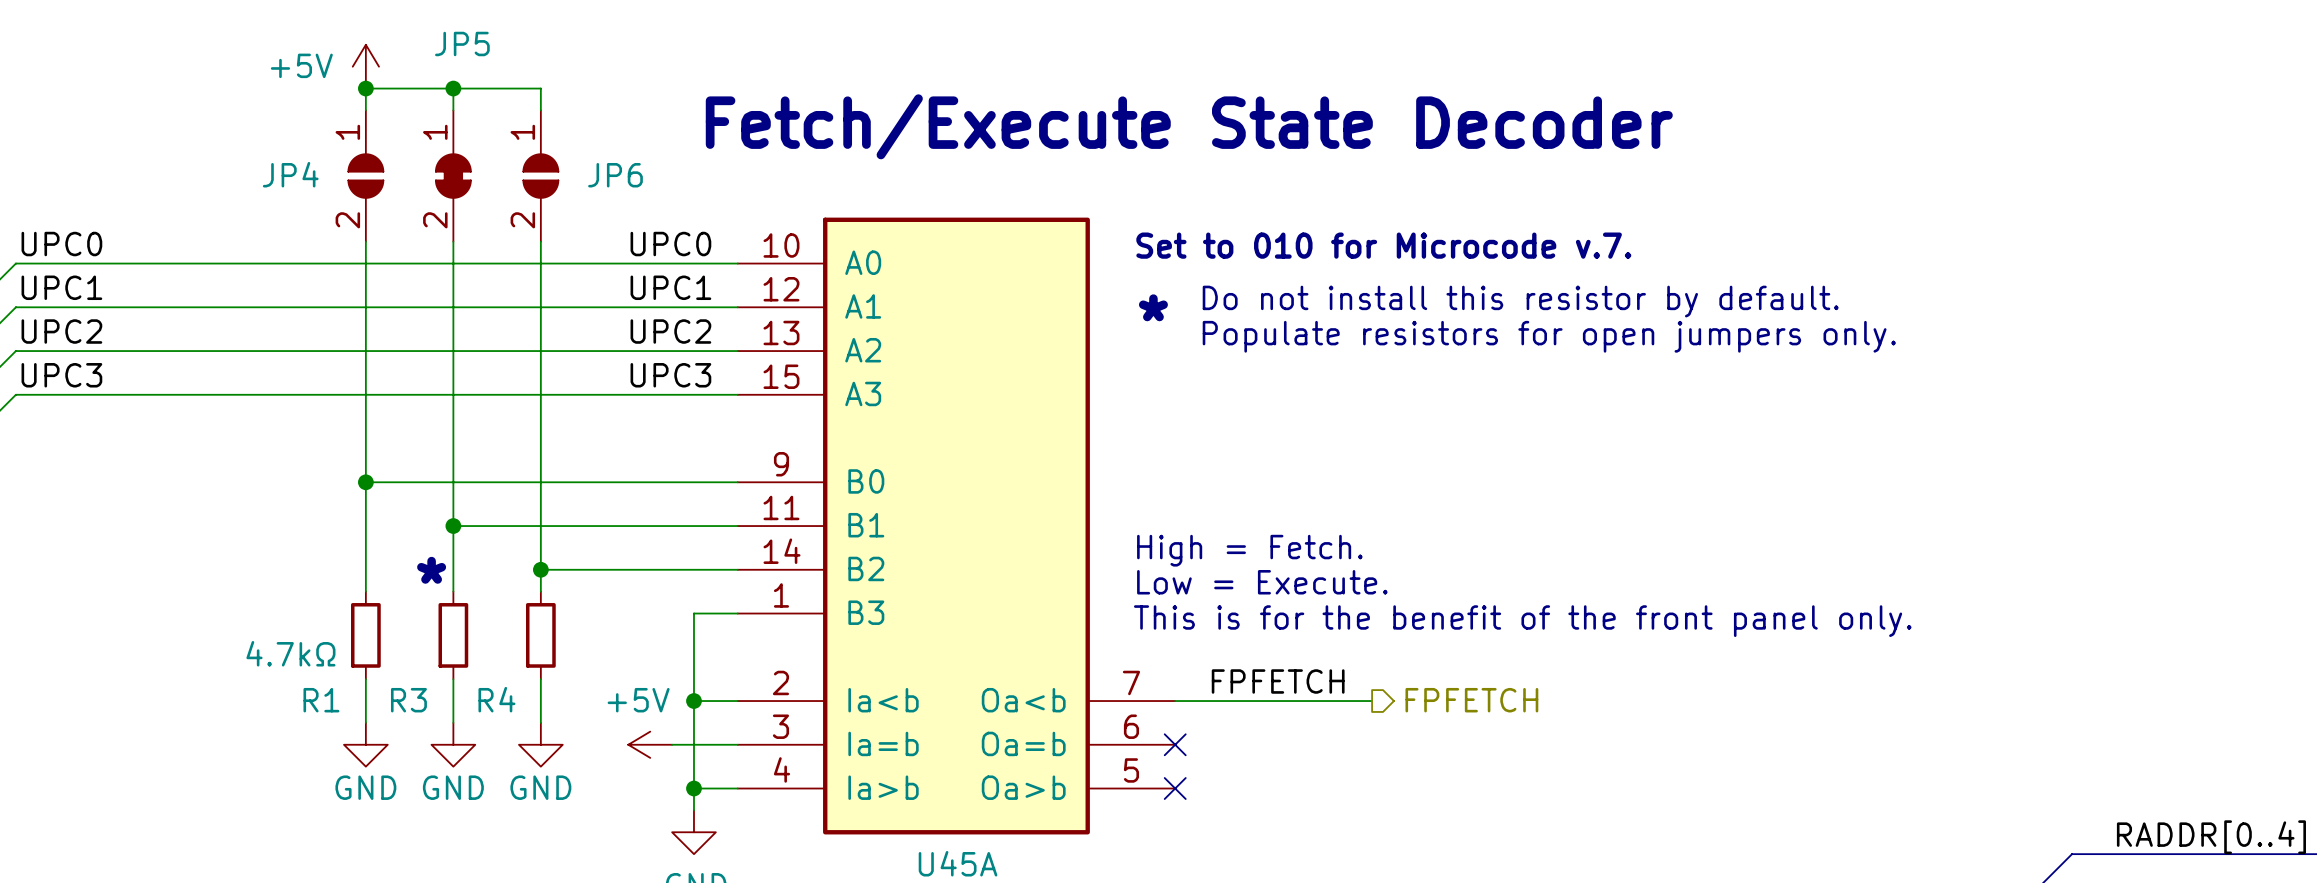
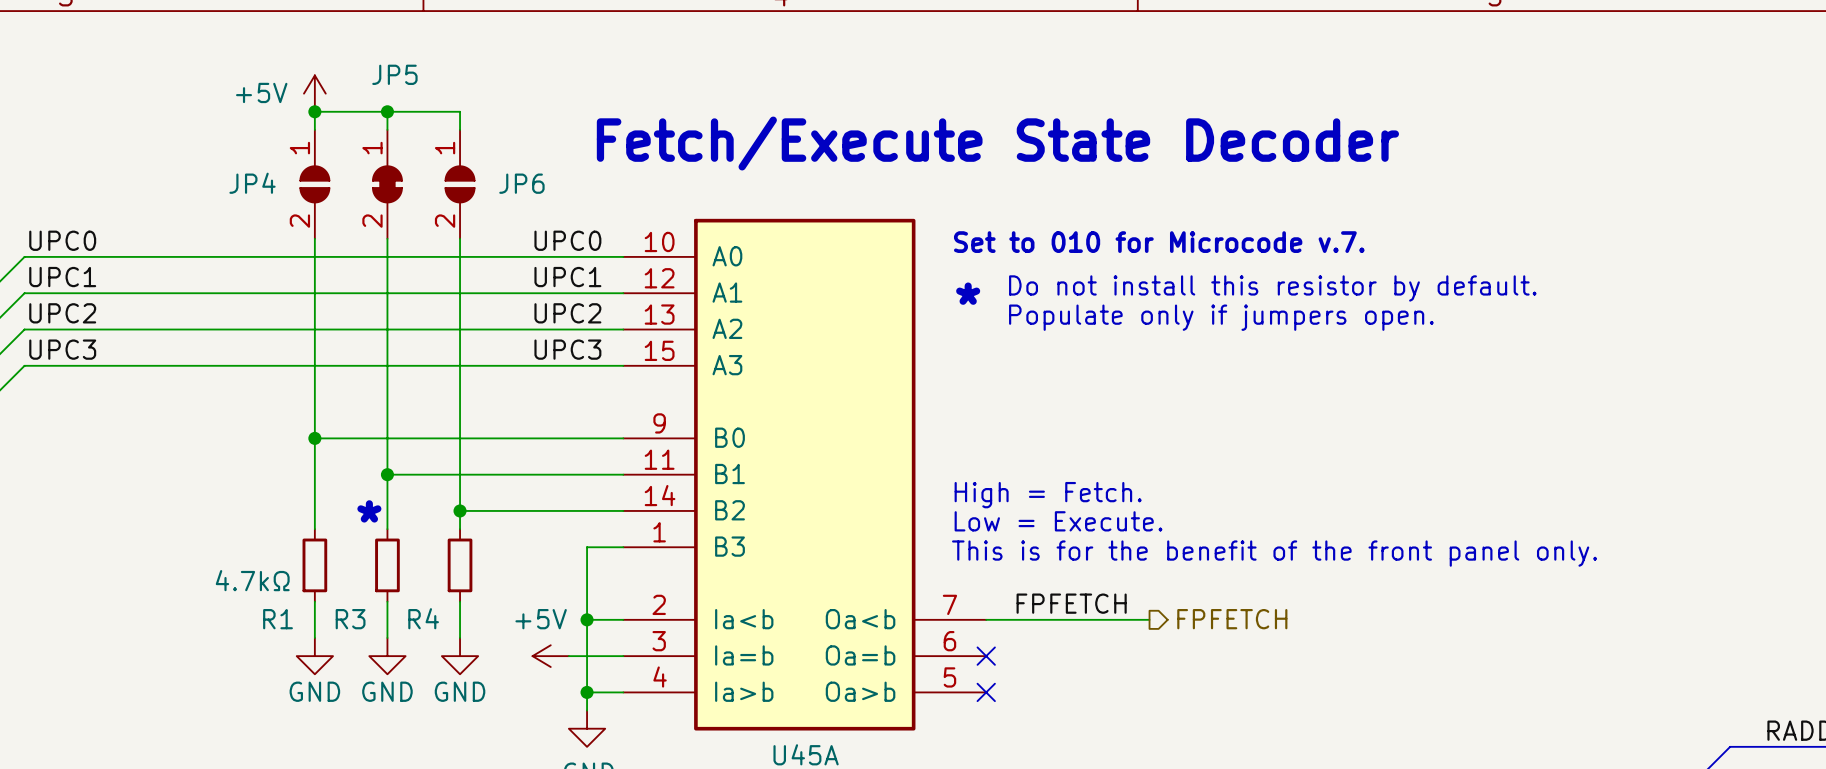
text: Populate resistors for open jumpers only. (1549, 336) -> Populate only if jumpers open. (1221, 317)

